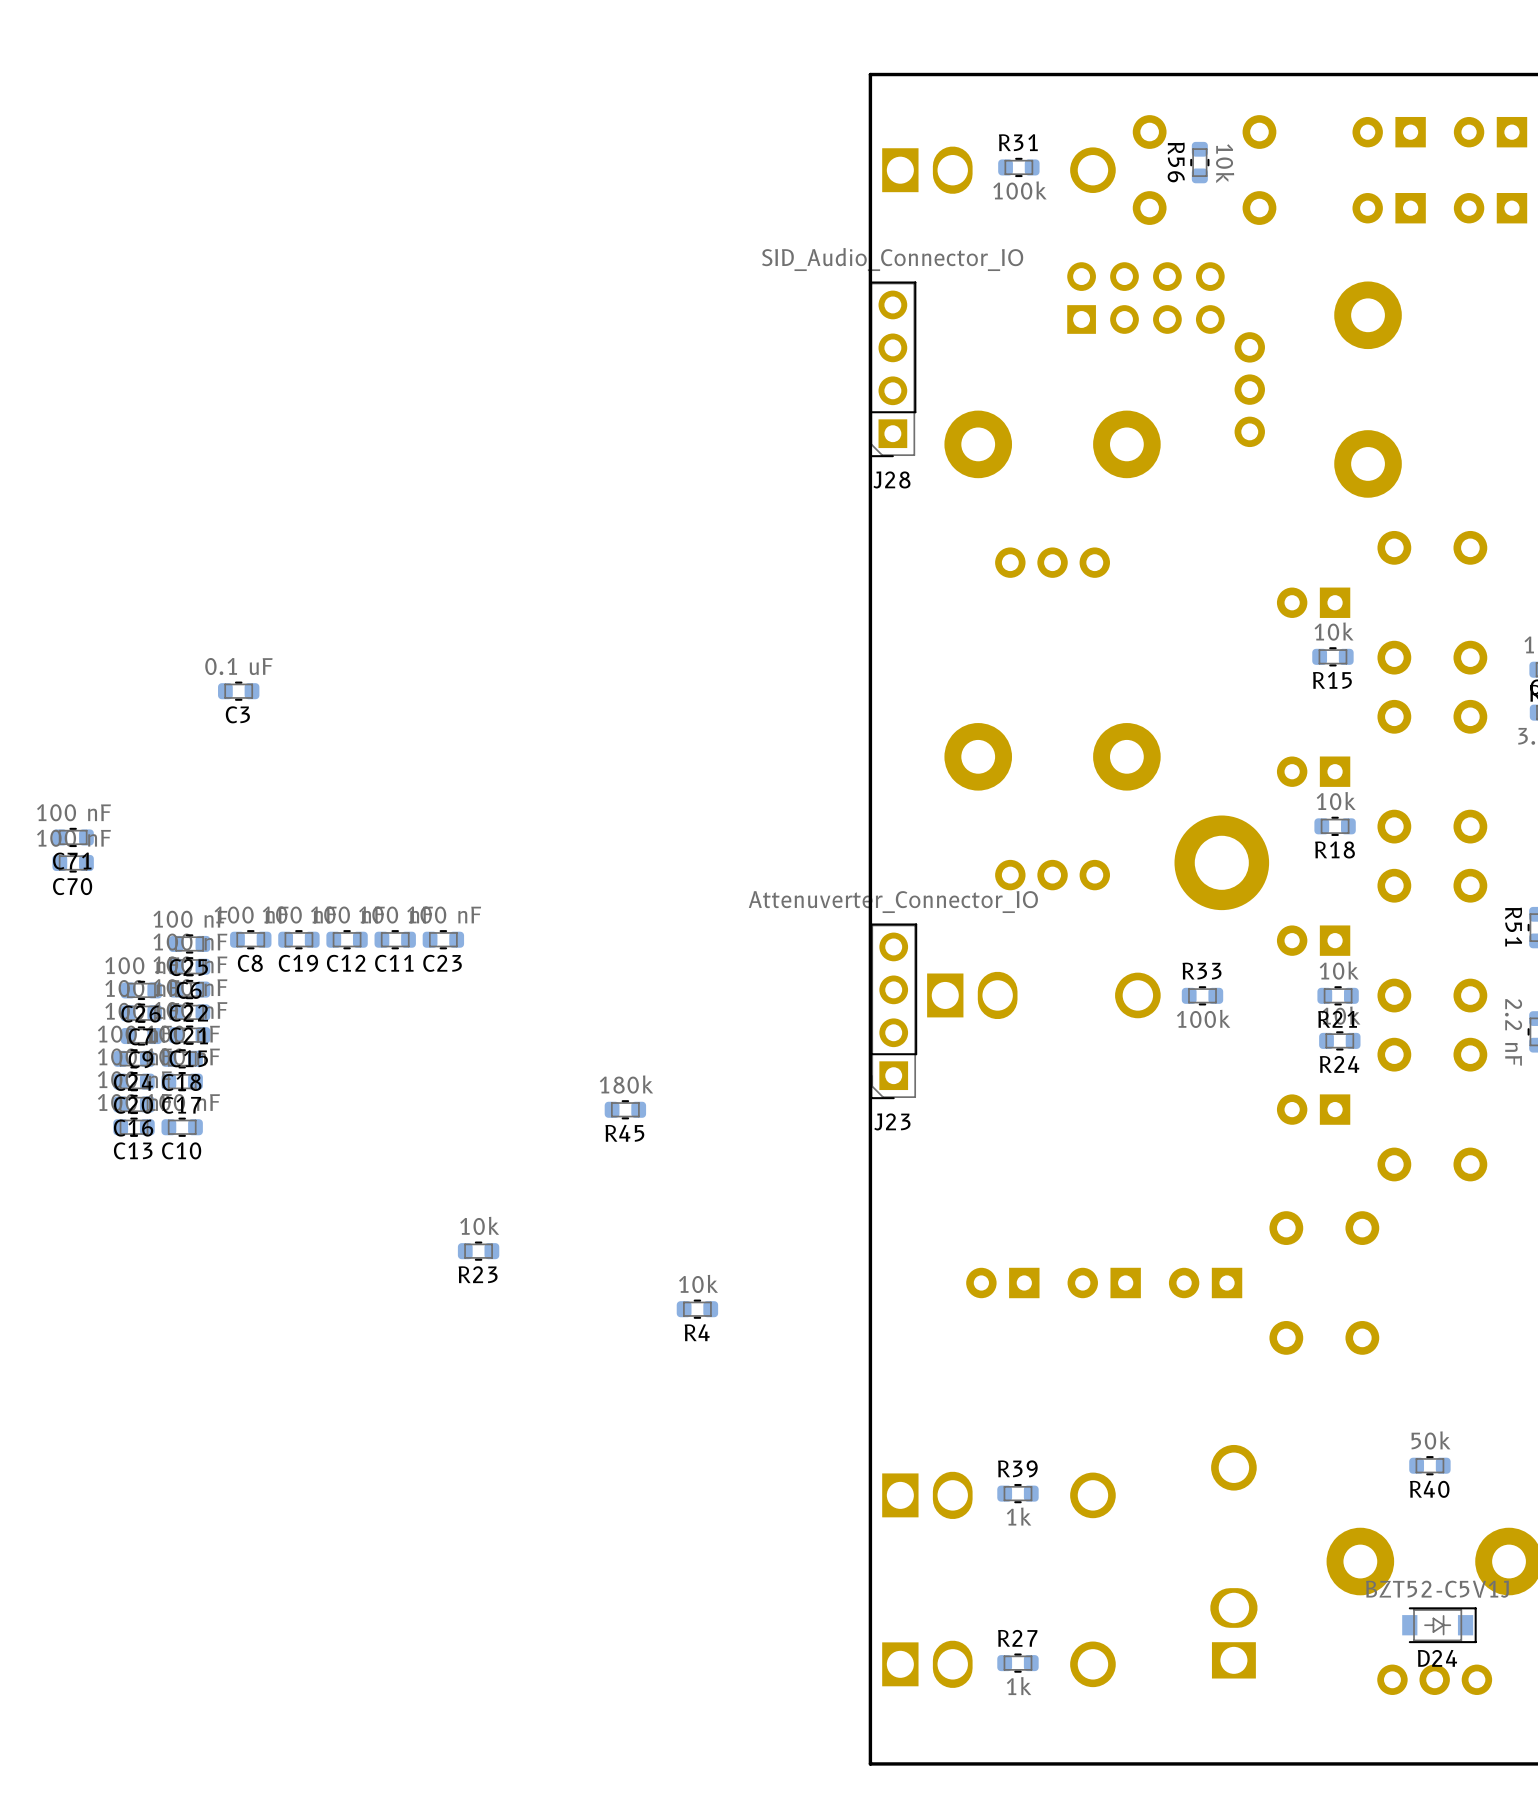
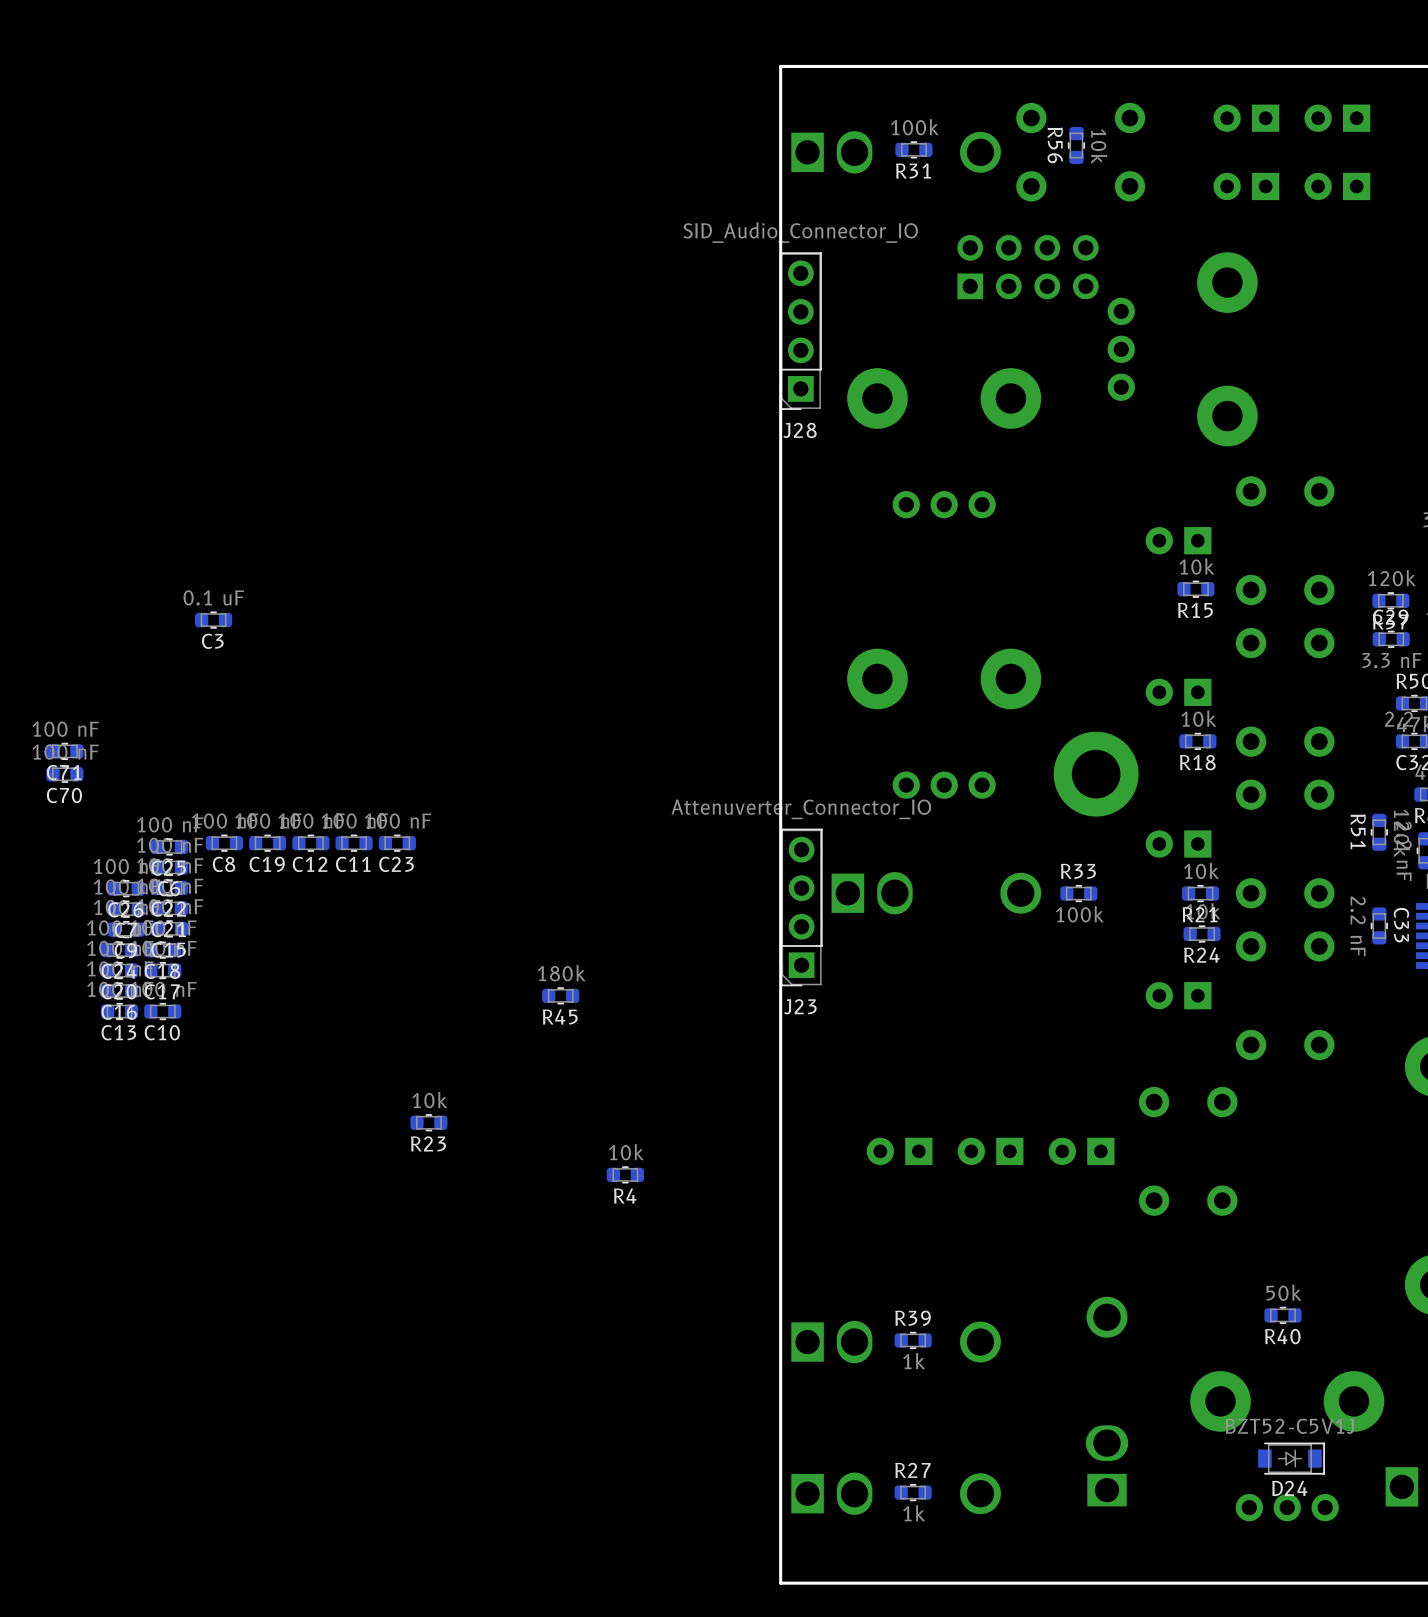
R31 name position: R31 (1018, 142) -> R31 (913, 170)
R31 value position: 100k (1019, 190) -> 100k (914, 127)

